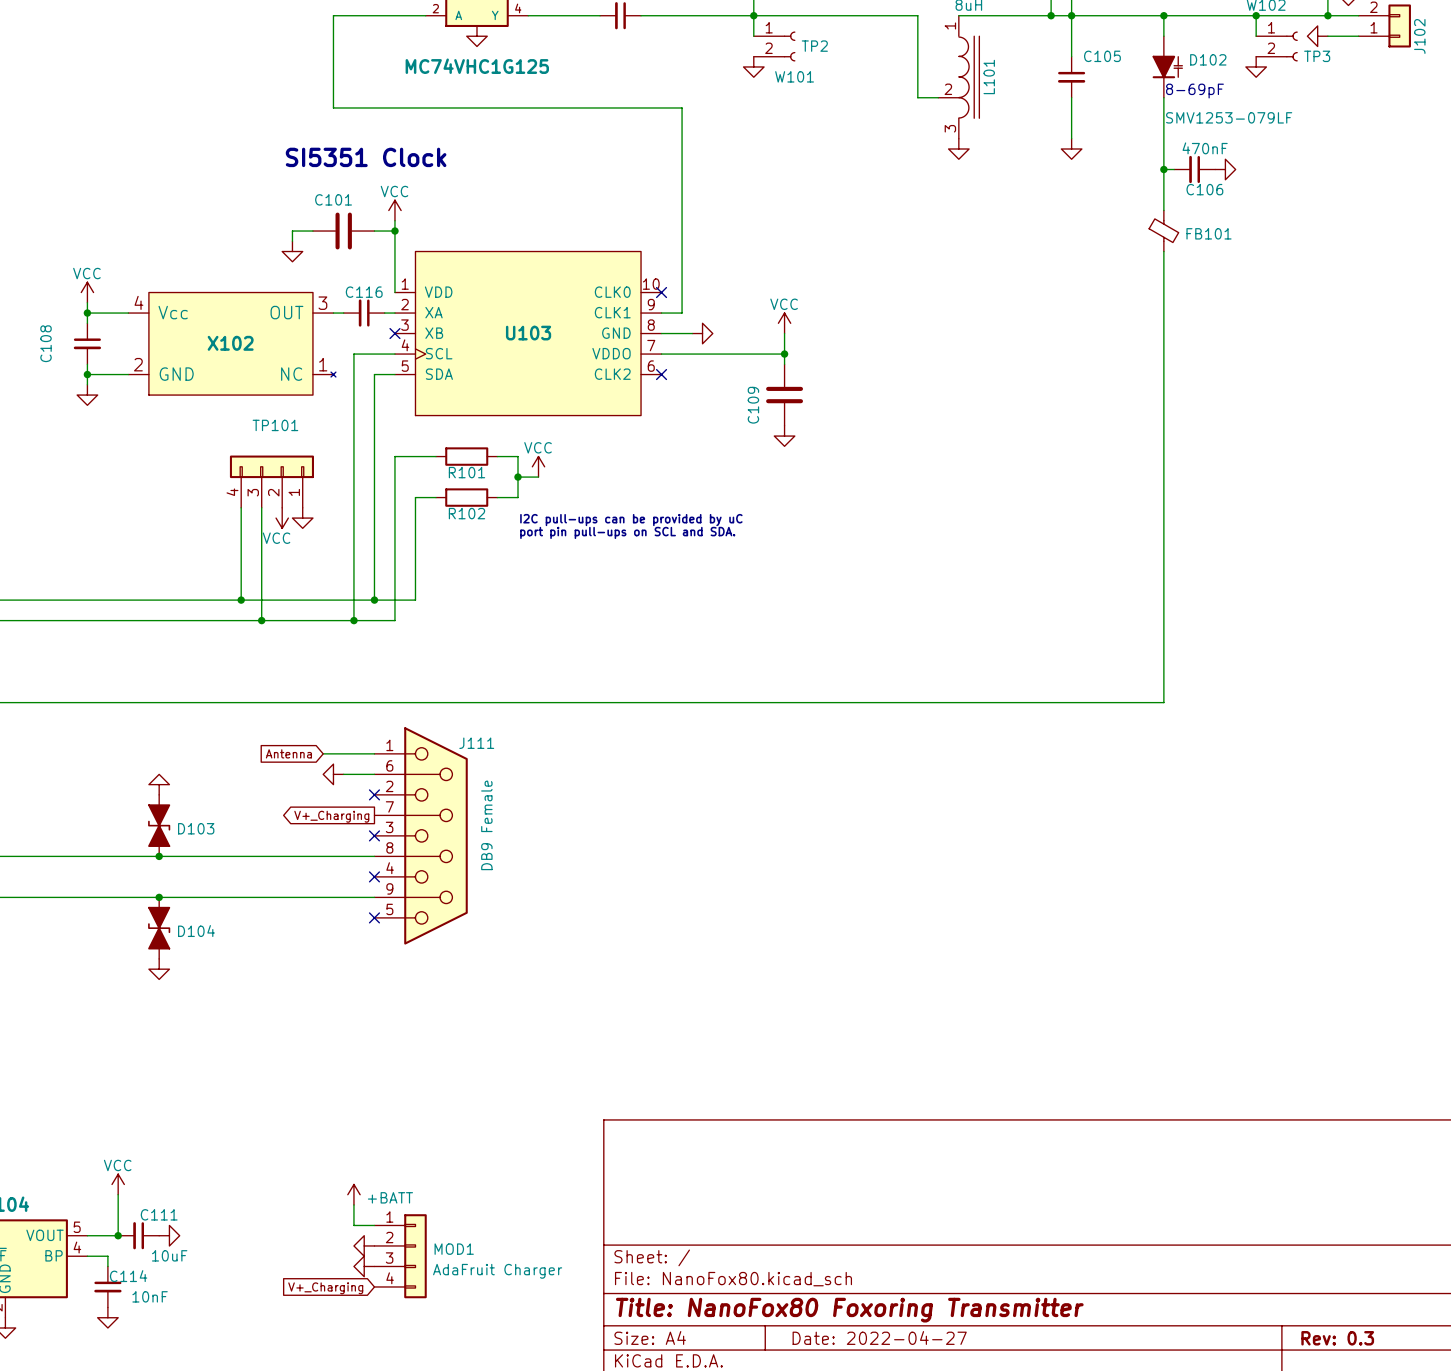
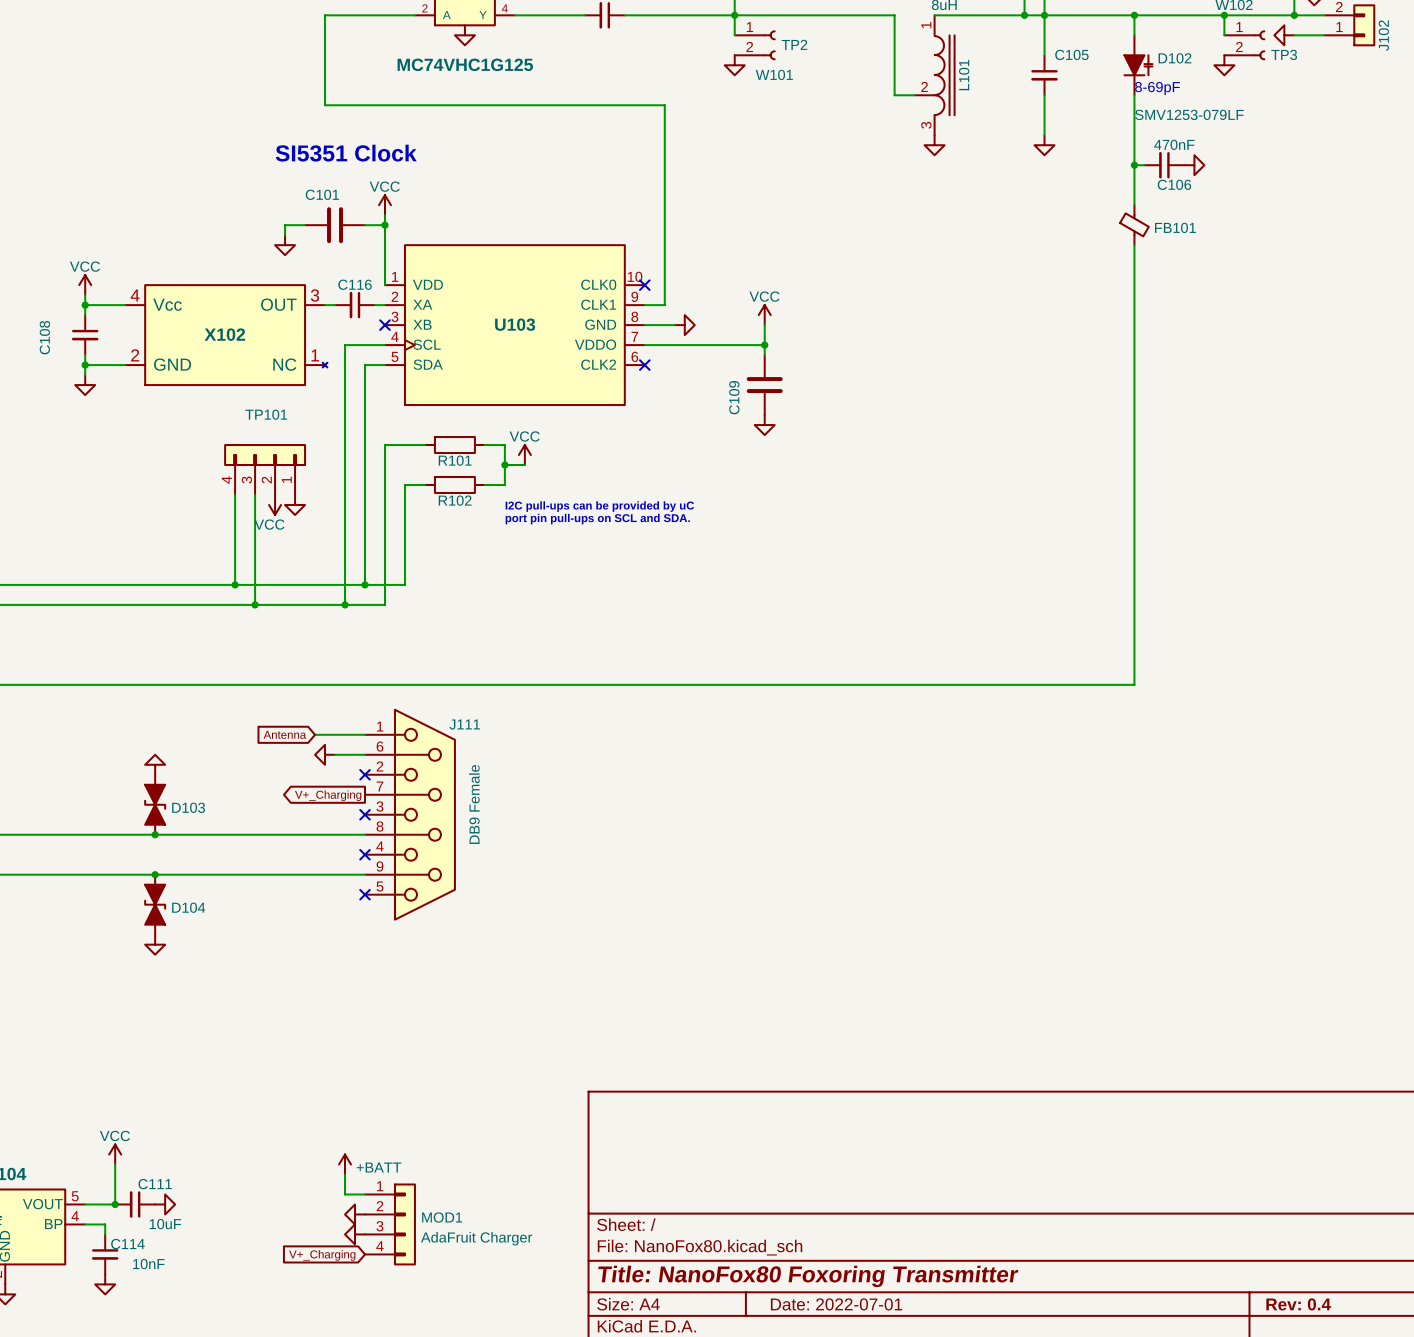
title block: Date: 2022-04-27 (879, 1337) -> Date: 2022-07-01 (836, 1304)
title block: Rev: 0.3 (1337, 1338) -> Rev: 0.4 (1298, 1304)

